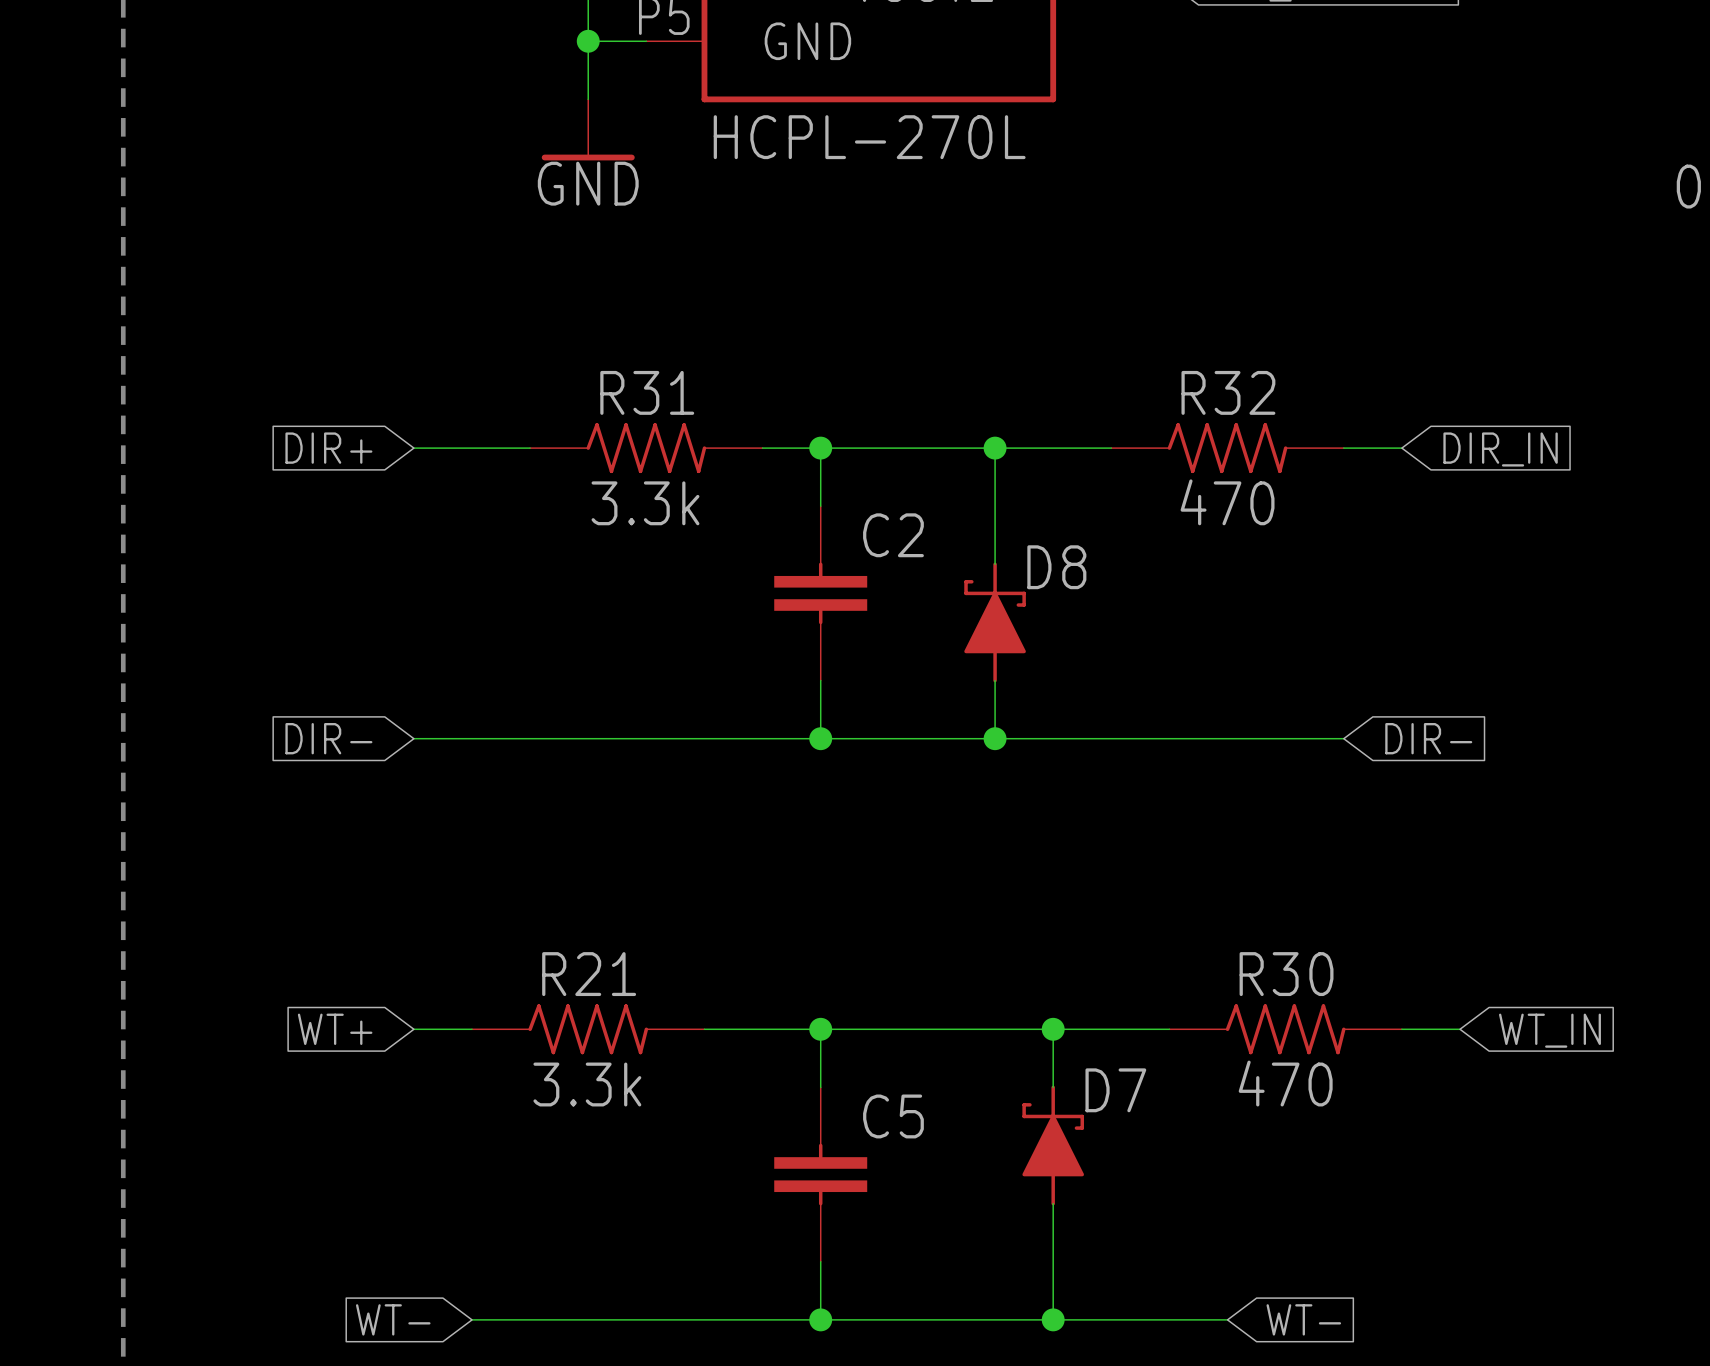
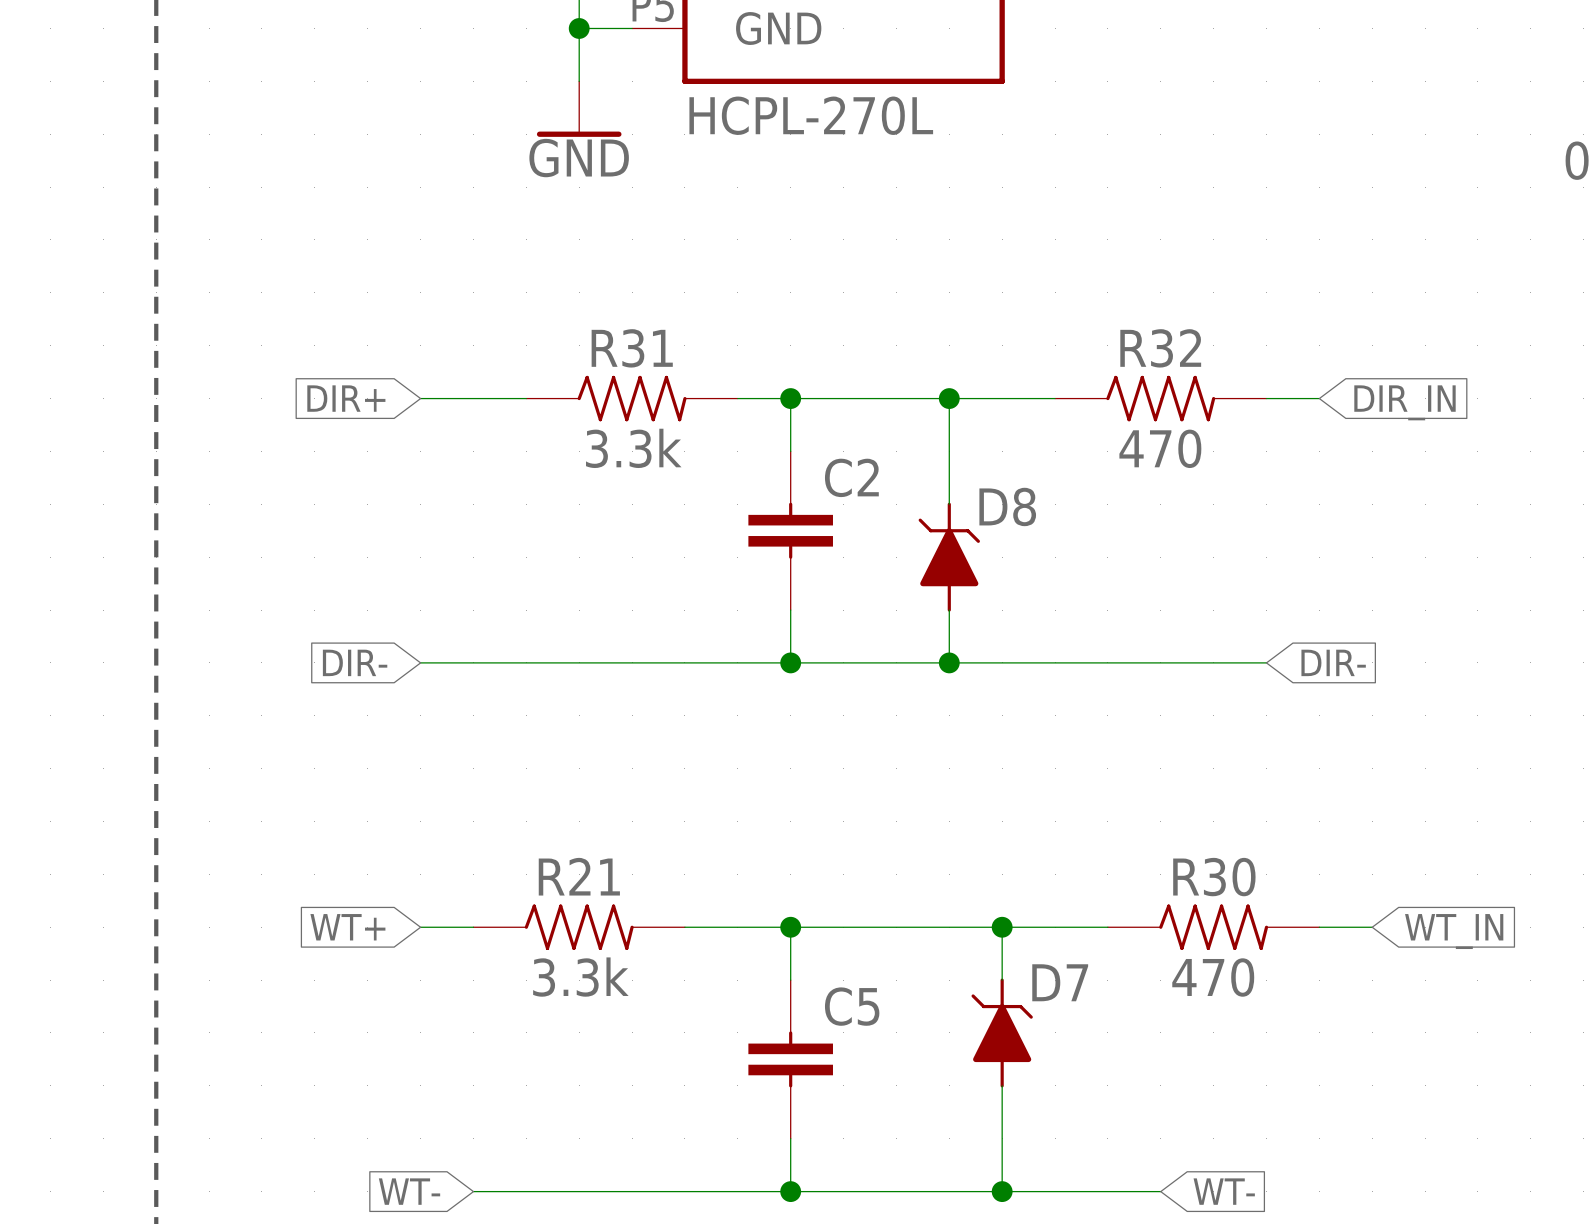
D8 symbol: [964, 562, 1026, 683] -> [918, 502, 980, 612]
D7 symbol: [1022, 1085, 1084, 1206] -> [971, 978, 1033, 1088]

